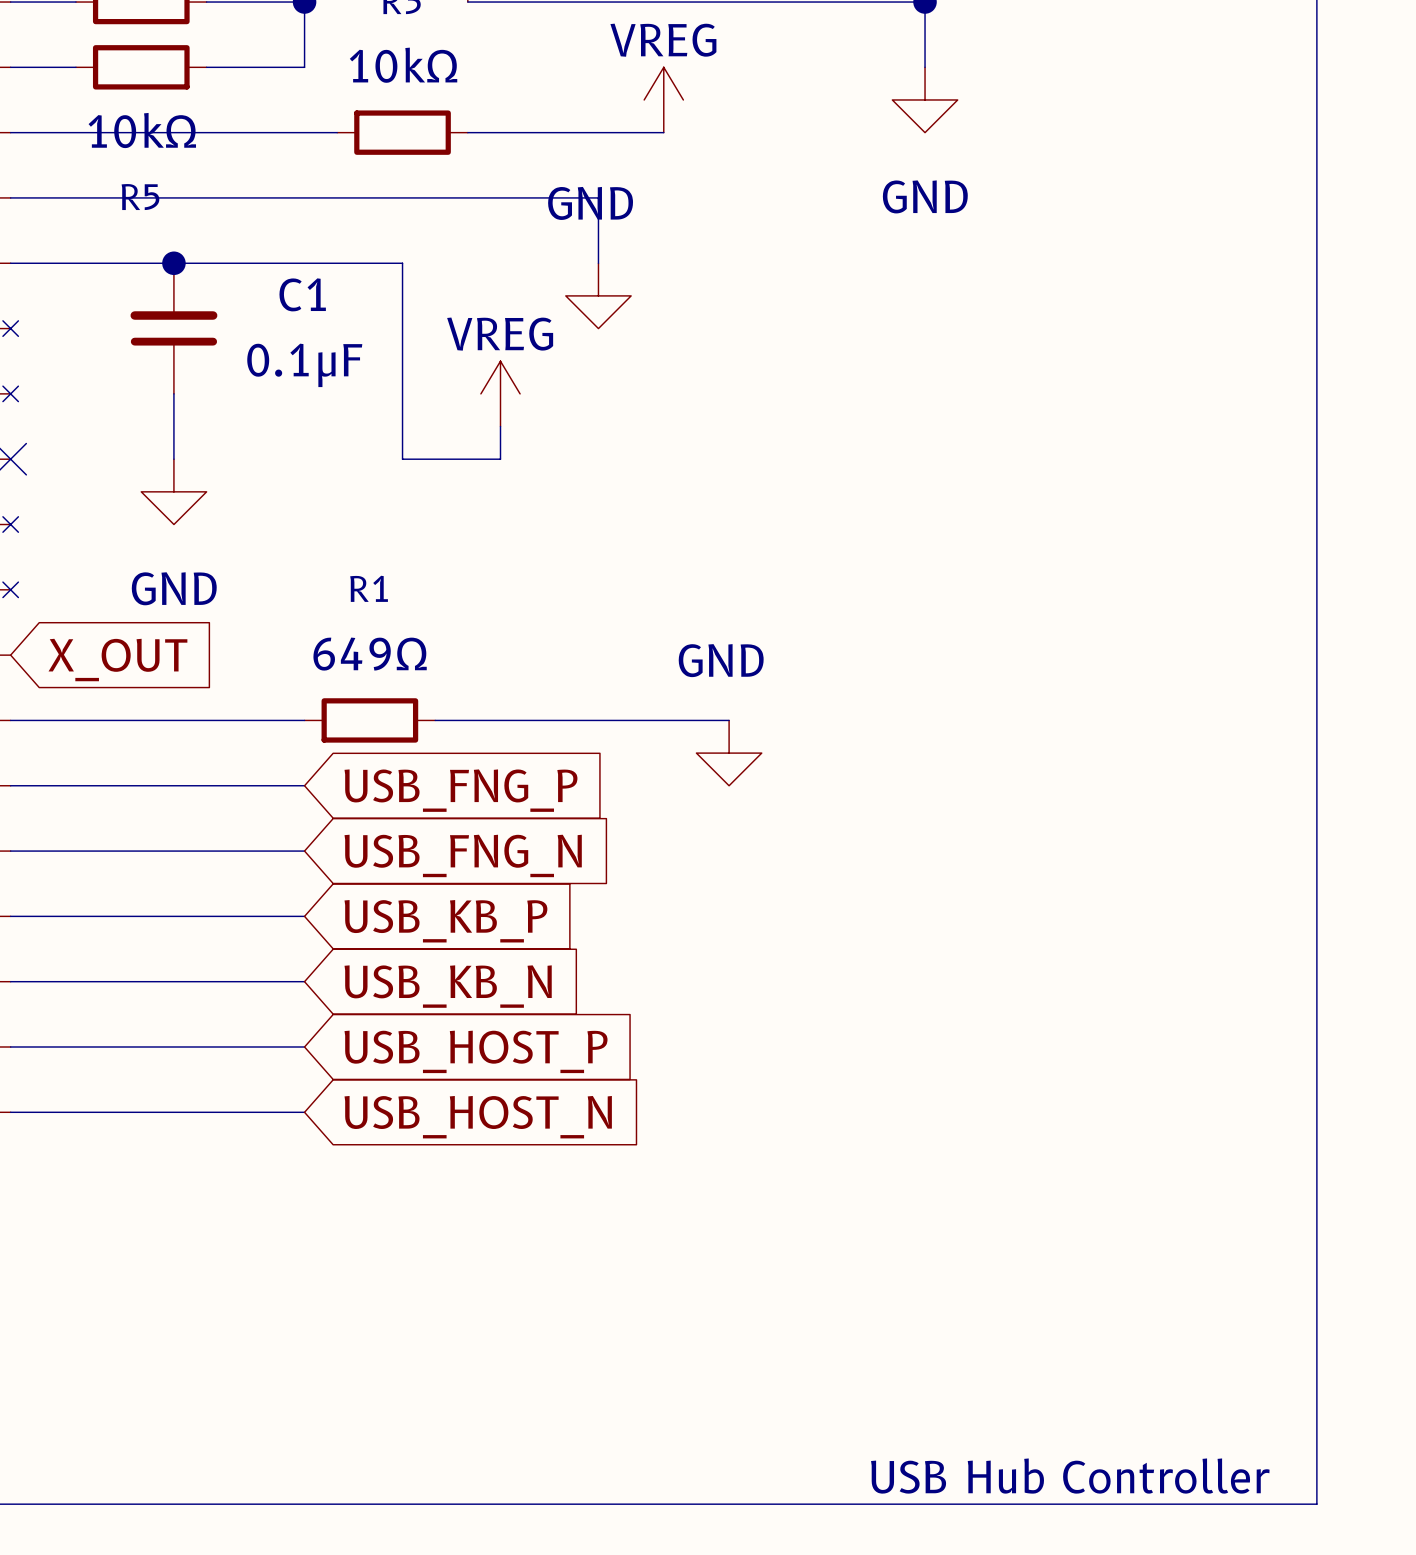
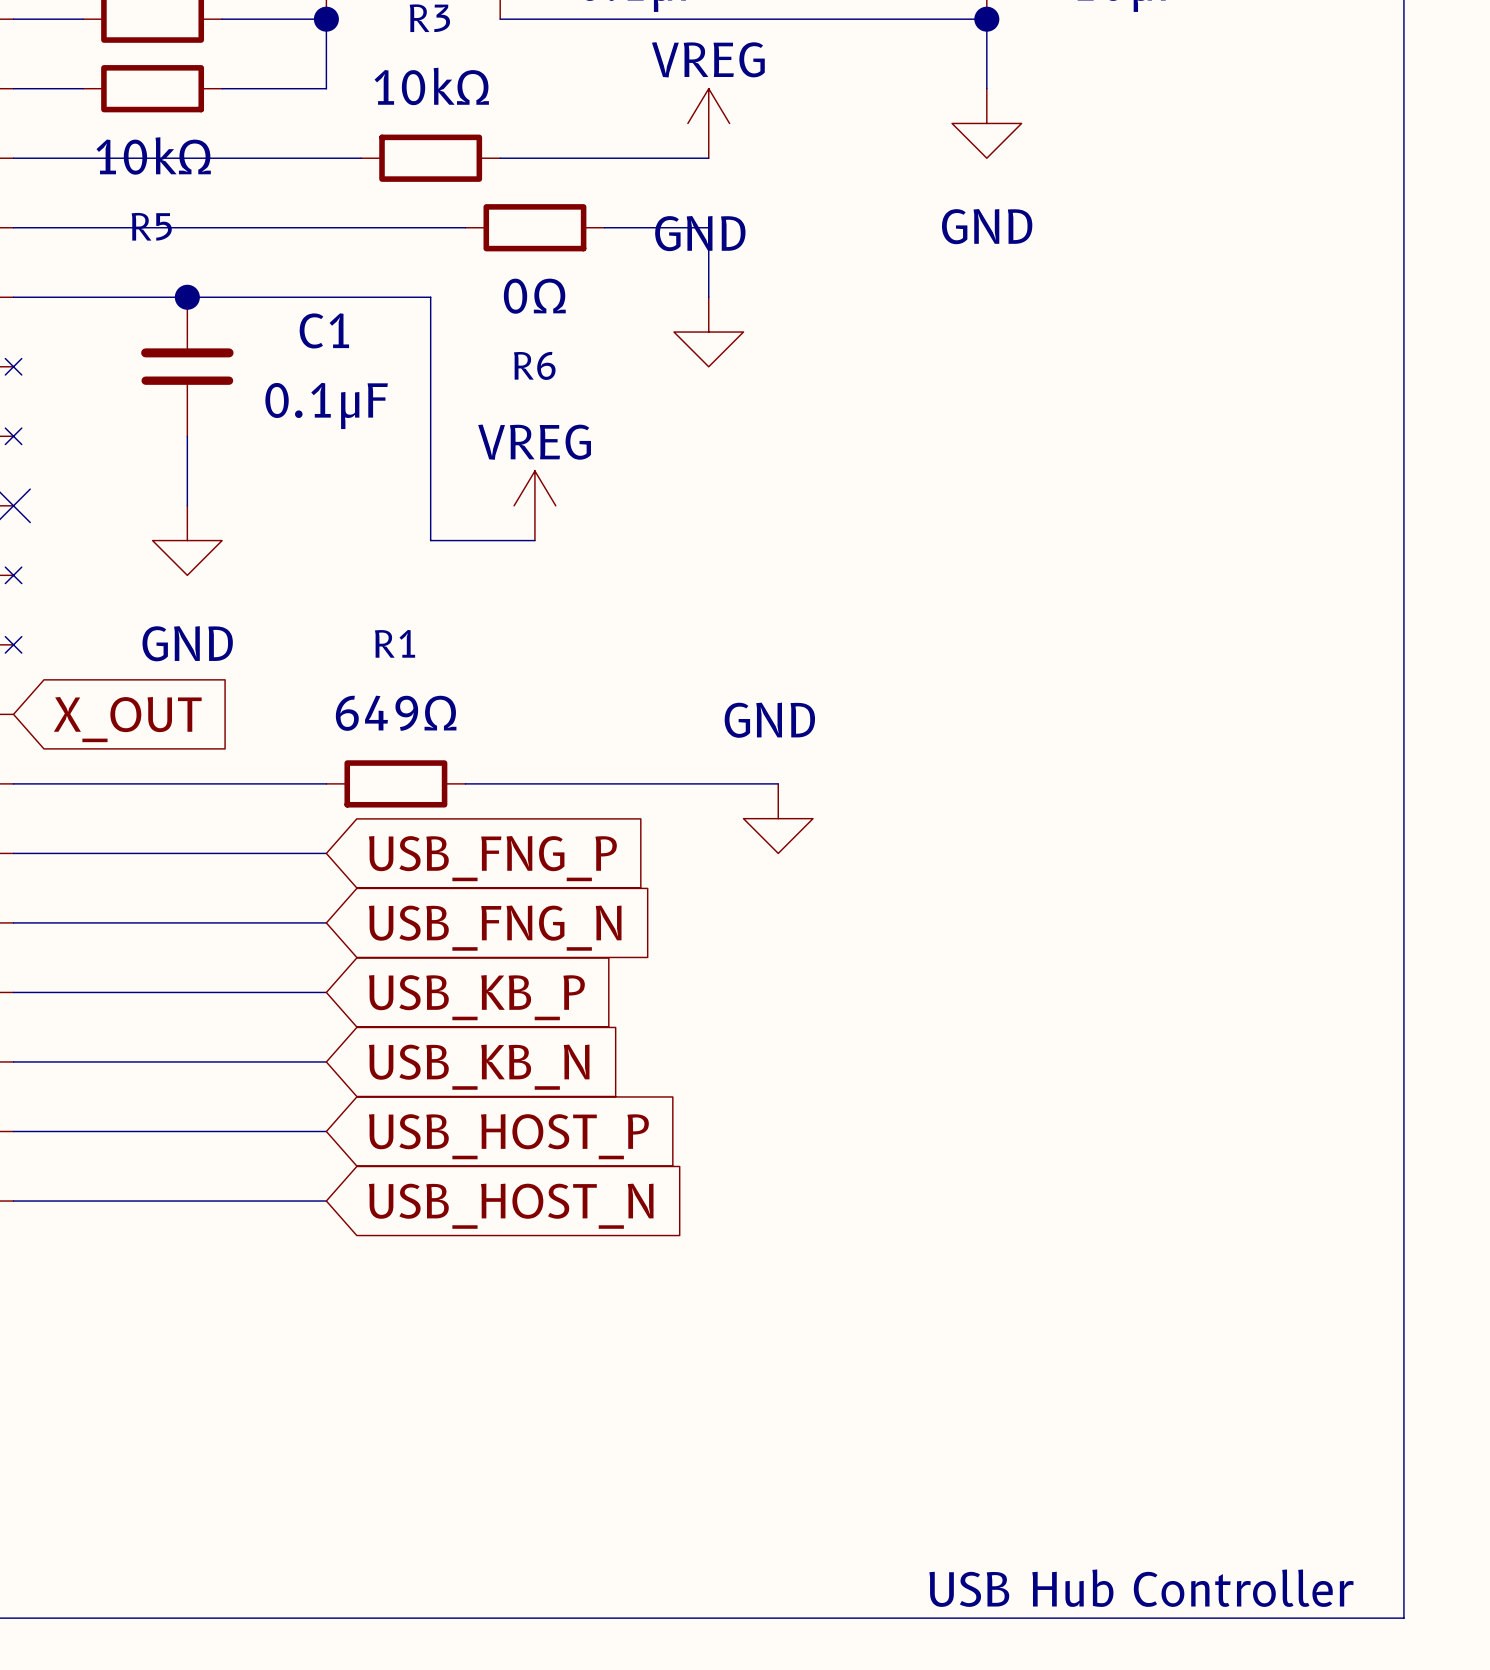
wire: (435, 197) (565, 197) -> none
R6: none -> 0Ω (534, 227)
wire: (598, 197) (598, 263) -> (639, 227) (708, 227) (708, 297)
power symbol position: GND (598, 295) -> GND (708, 332)
power symbol position: VREG (500, 393) -> VREG (534, 505)
wire: (500, 426) (500, 459) (402, 459) -> (534, 540) (430, 540) (430, 505)

